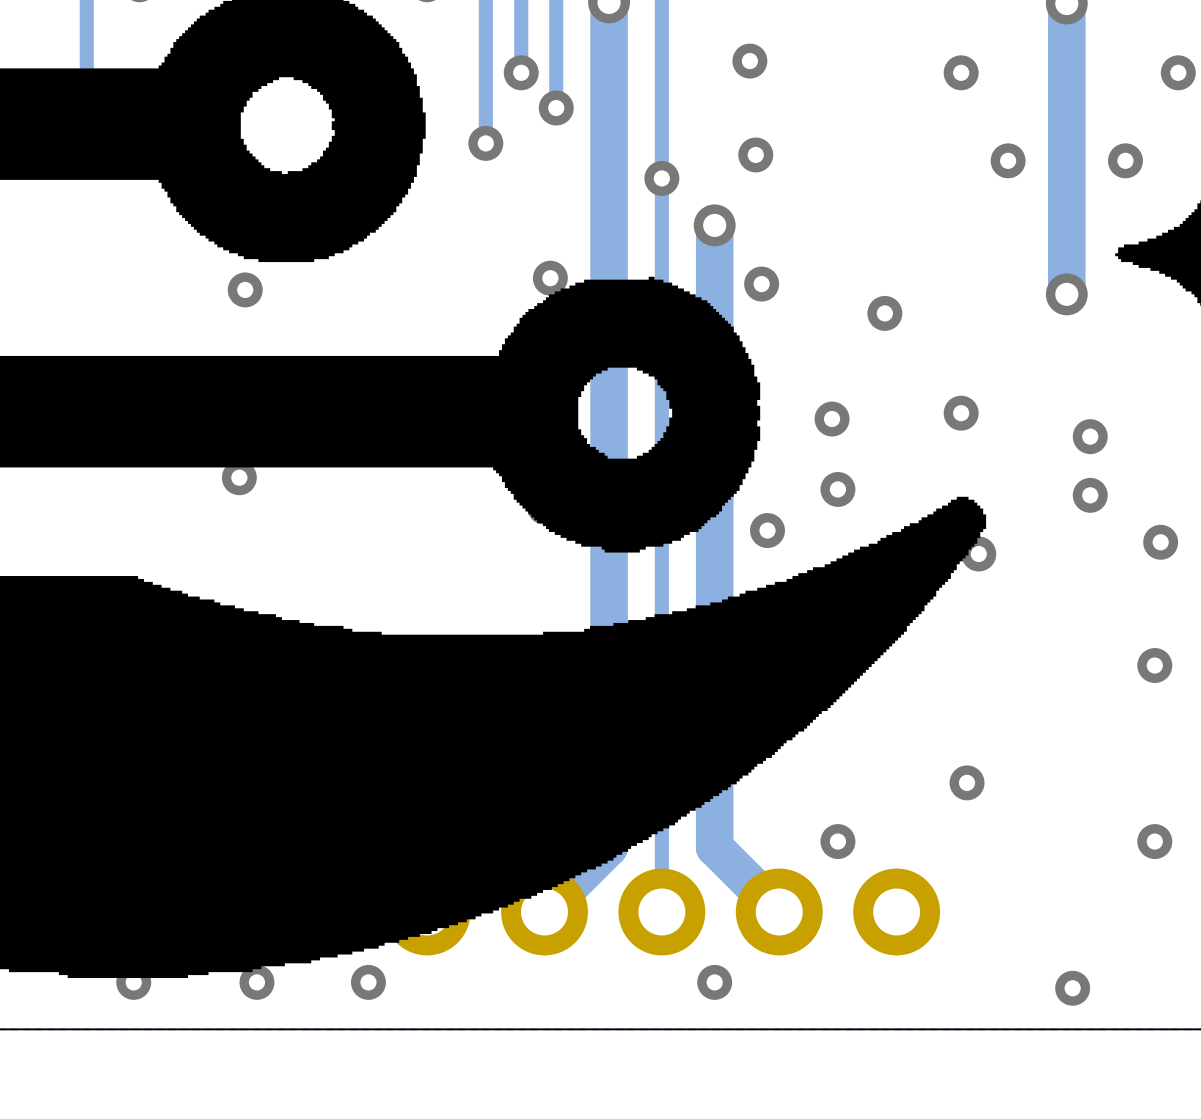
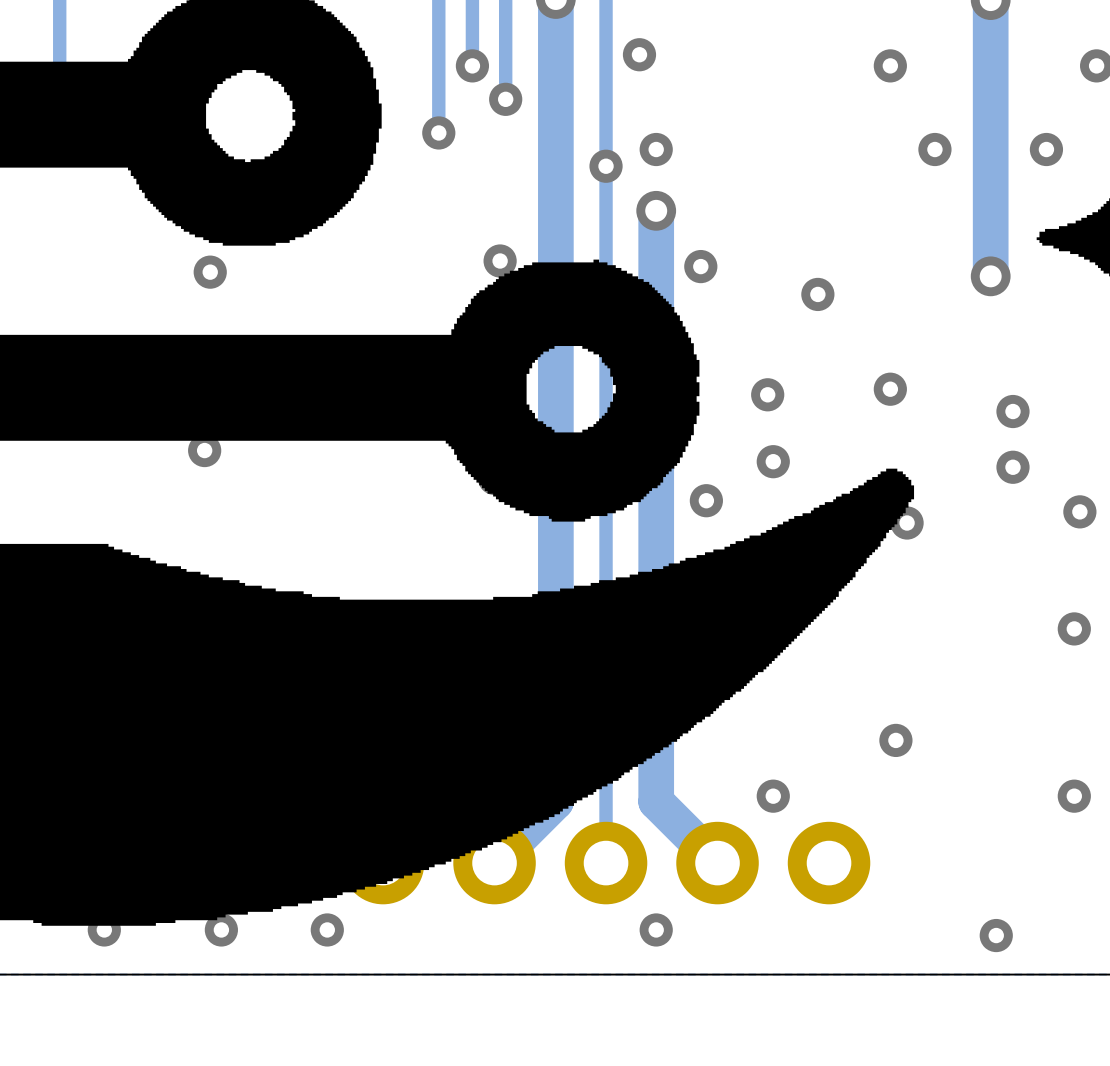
via: none -> (639, 54)
via: (749, 61) -> none
via position: (755, 154) -> (656, 149)

